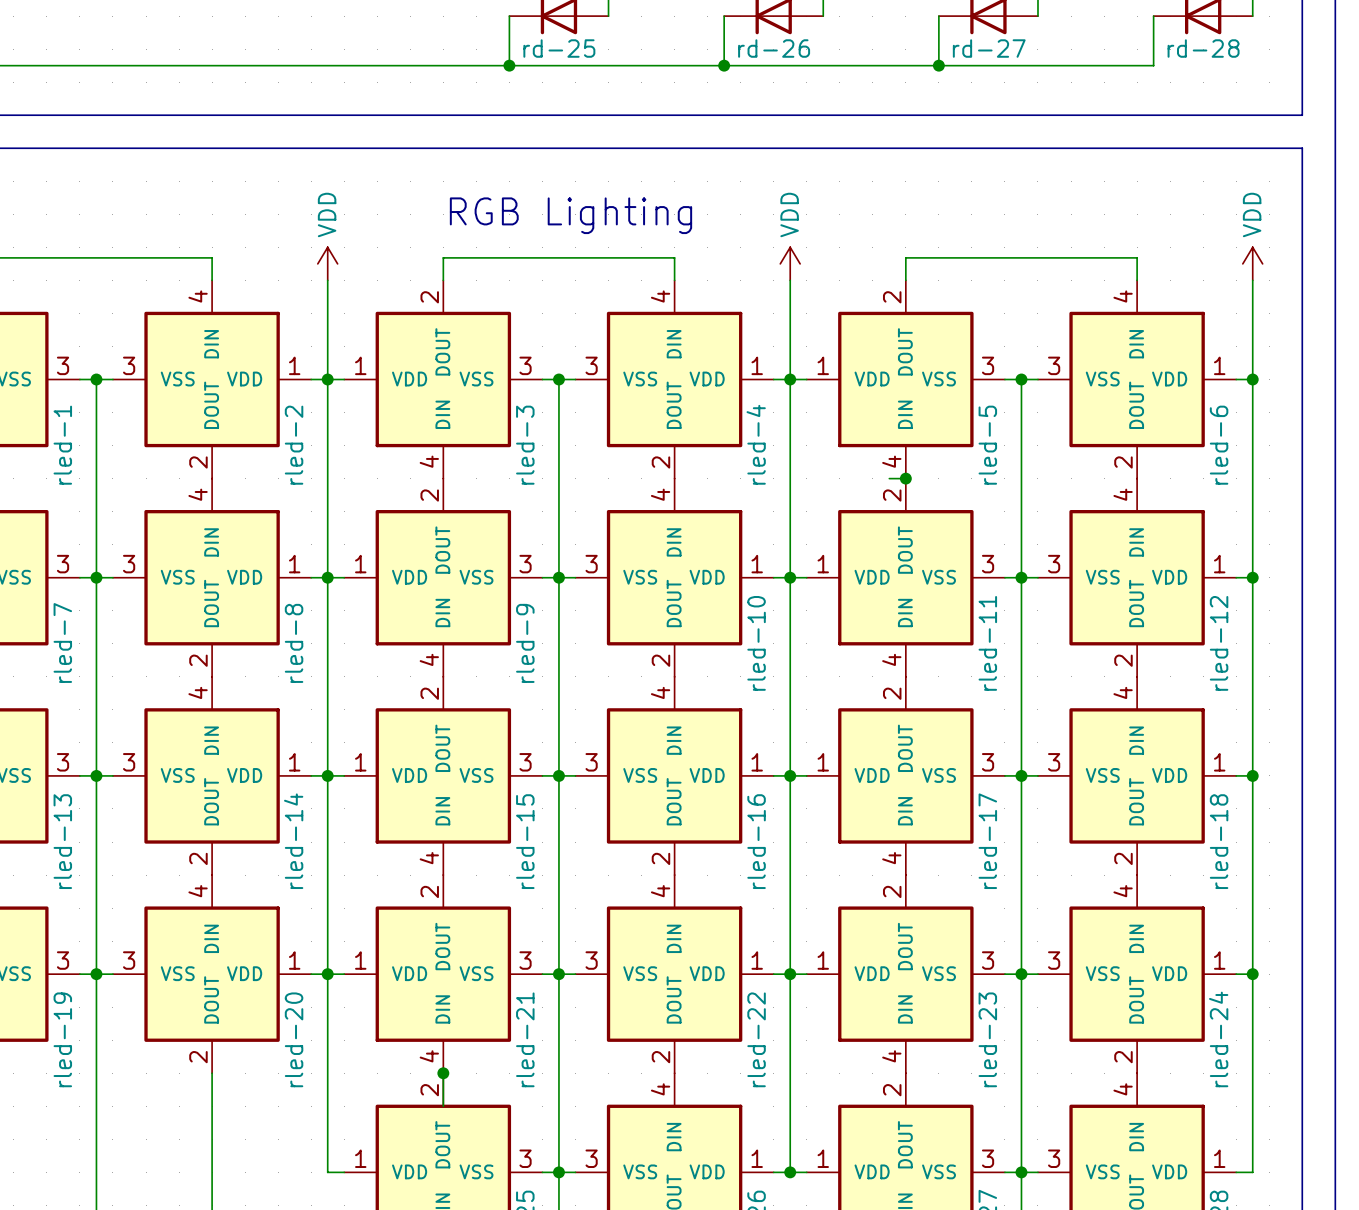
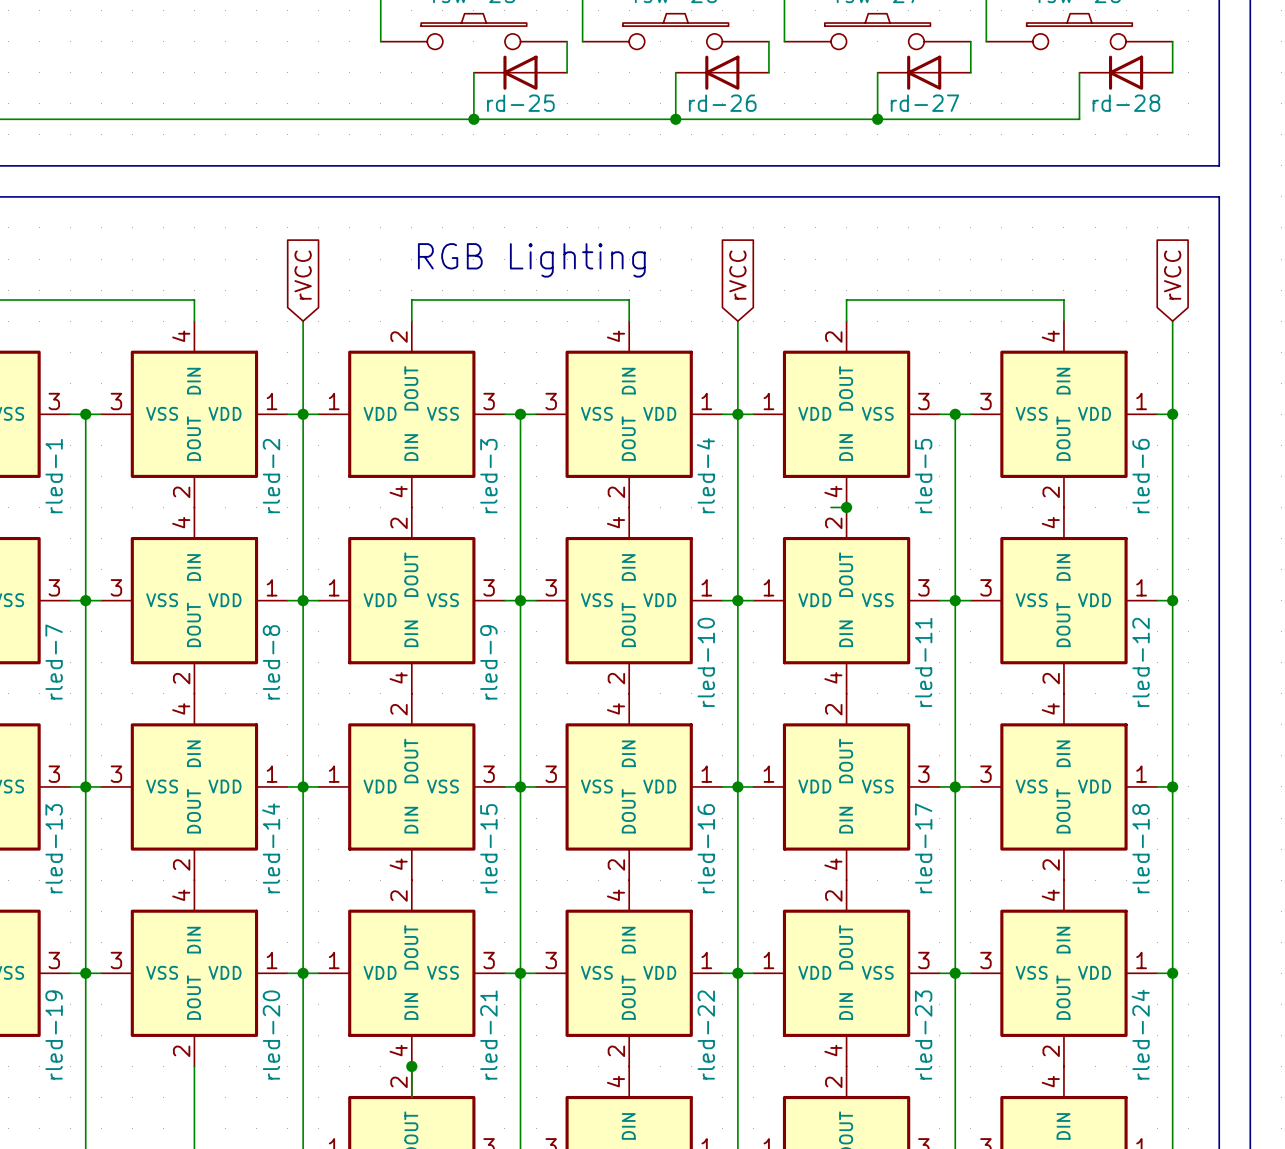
global label: none -> rVCC (303, 275)
global label: none -> rVCC (737, 275)
global label: none -> rVCC (1172, 275)
power symbol: VDD (327, 263) -> none
power symbol: VDD (790, 263) -> none
power symbol: VDD (1252, 263) -> none

